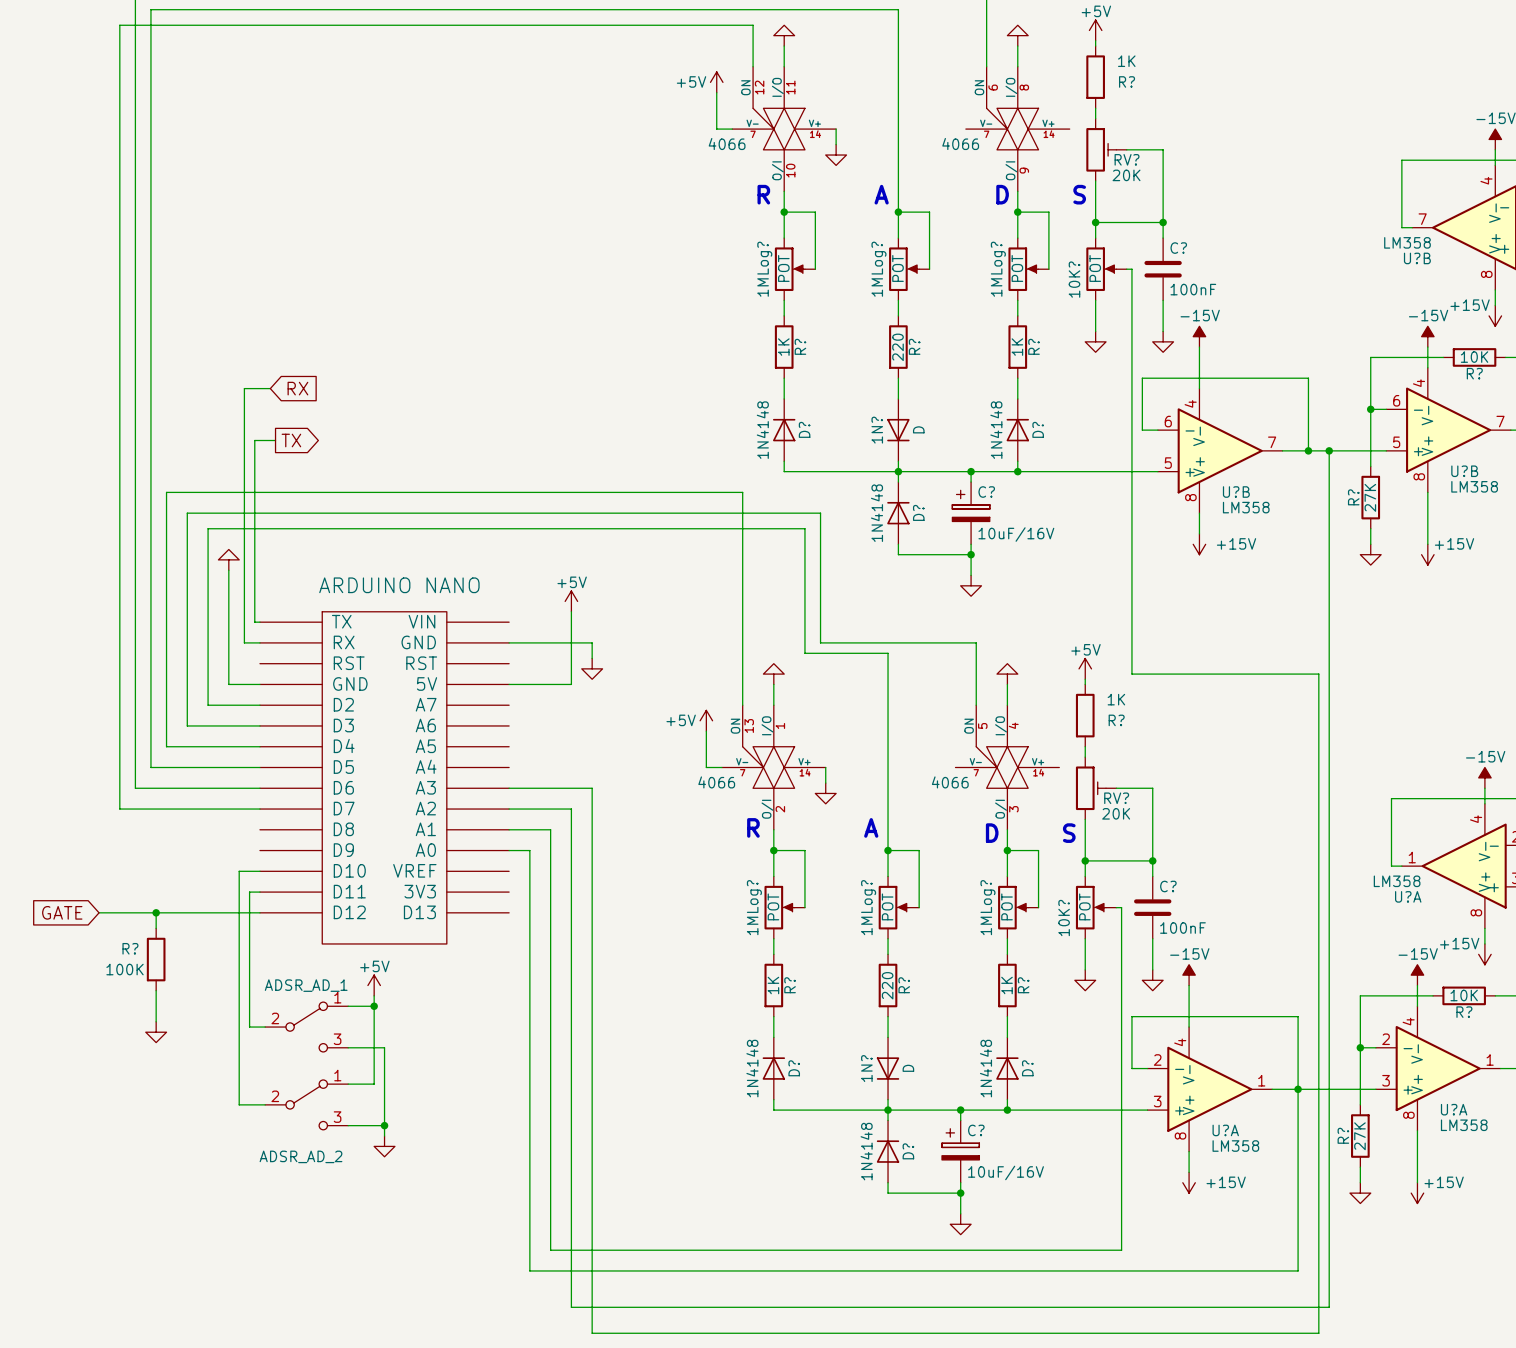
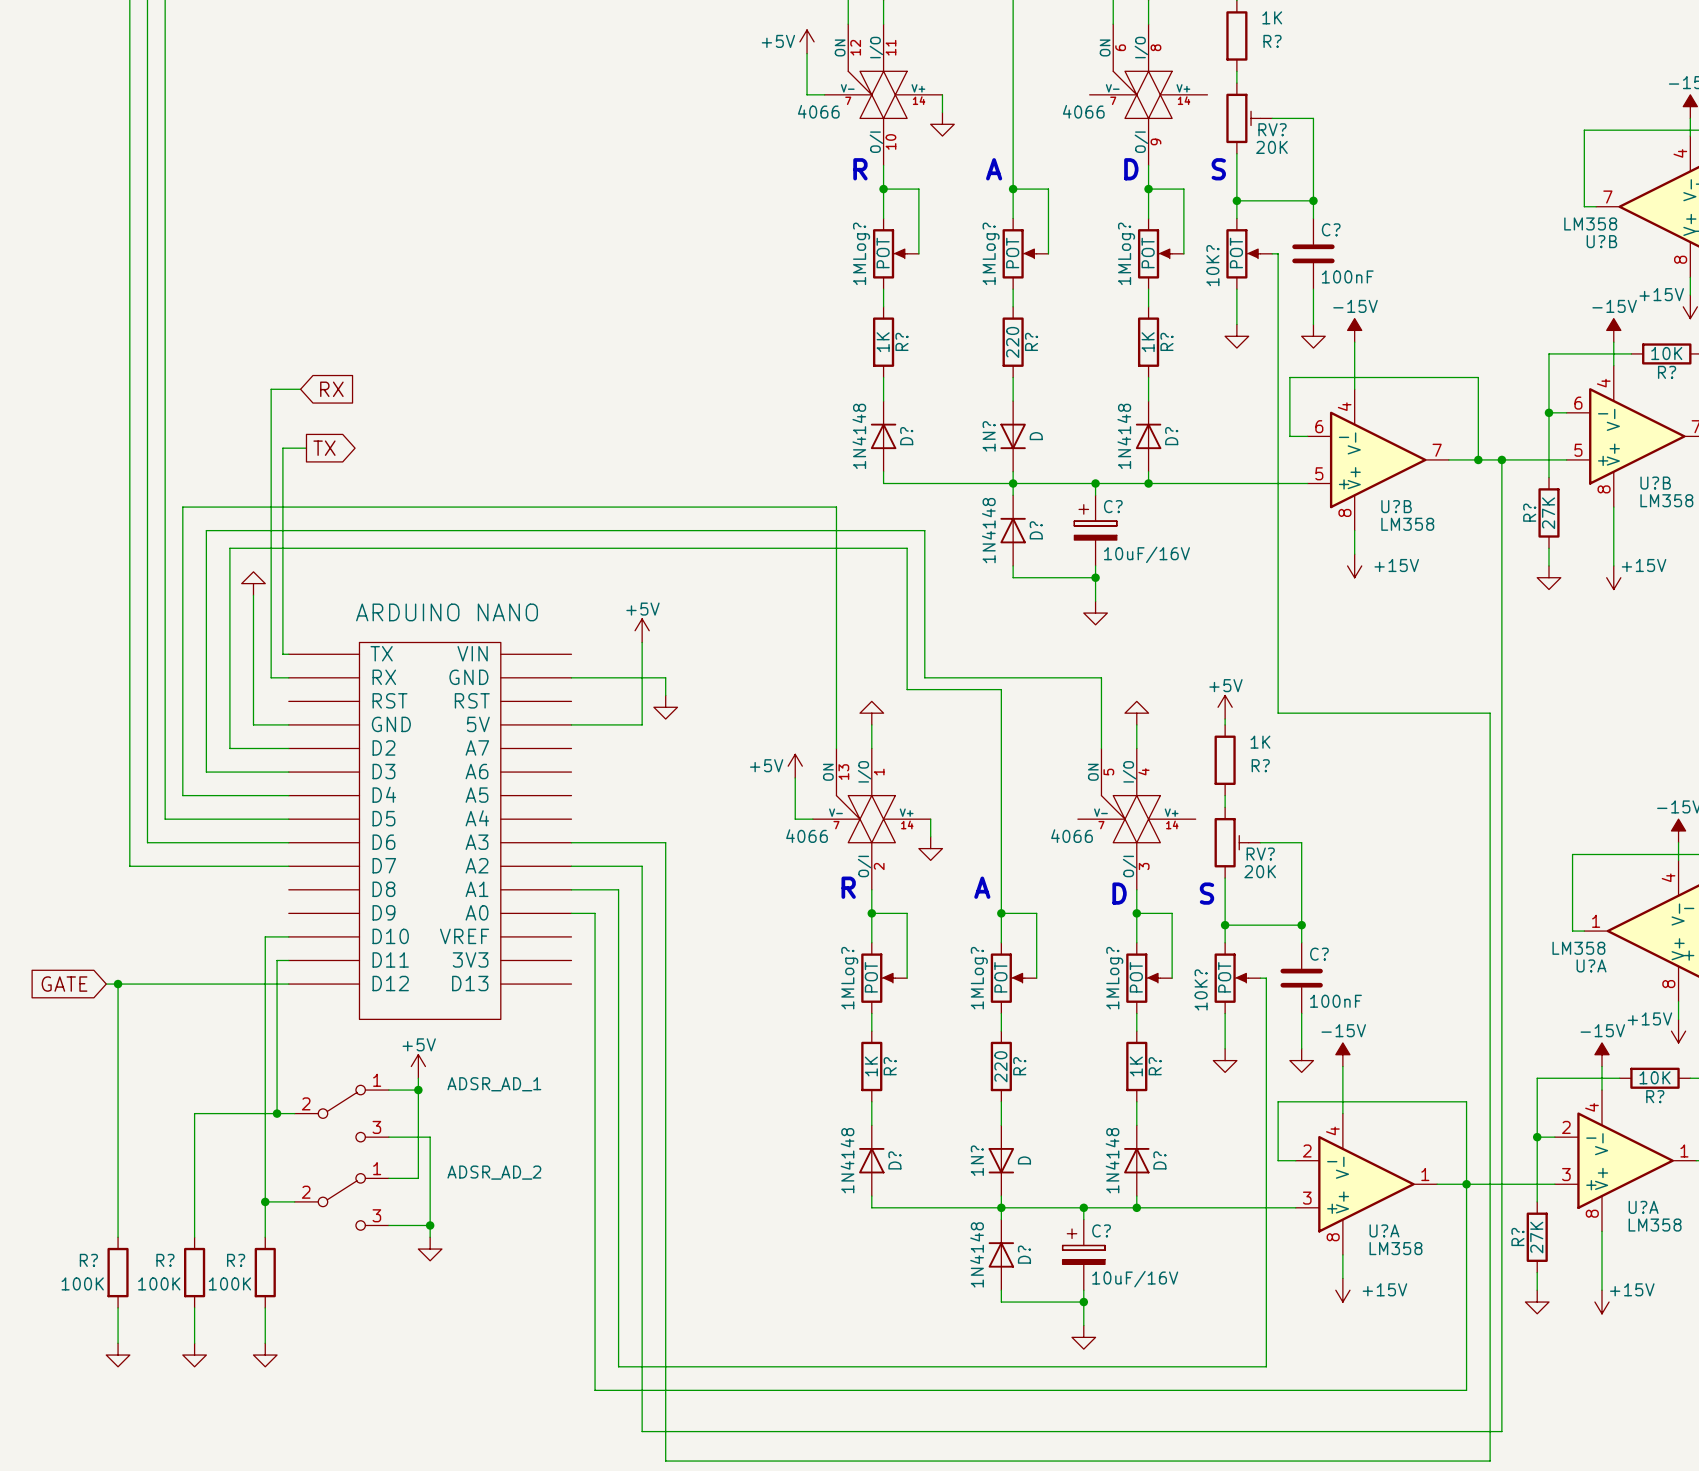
wire: none -> (118, 984) (118, 1237)
wire: (156, 912) (156, 928) -> none
junction position: (156, 912) -> (118, 984)
R?: 100K (156, 959) -> none
part value position: ADSR_AD_1 (306, 985) -> ADSR_AD_1 (494, 1084)
wire: (156, 990) (156, 1021) -> (265, 1201) (265, 1237)
wire: none -> (277, 1113) (194, 1113) (194, 1237)
junction: none -> (277, 1113)
power symbol: (156, 1032) -> none
junction: none -> (265, 1201)
part value position: ADSR_AD_2 (300, 1156) -> ADSR_AD_2 (494, 1172)
R?: none -> 100K (118, 1272)
R?: none -> 100K (194, 1272)
R?: none -> 100K (265, 1272)
wire: none -> (118, 1307) (118, 1343)
wire: none -> (194, 1307) (194, 1343)
wire: none -> (265, 1307) (265, 1343)
power symbol: none -> (118, 1355)
power symbol: none -> (194, 1355)
power symbol: none -> (265, 1355)

